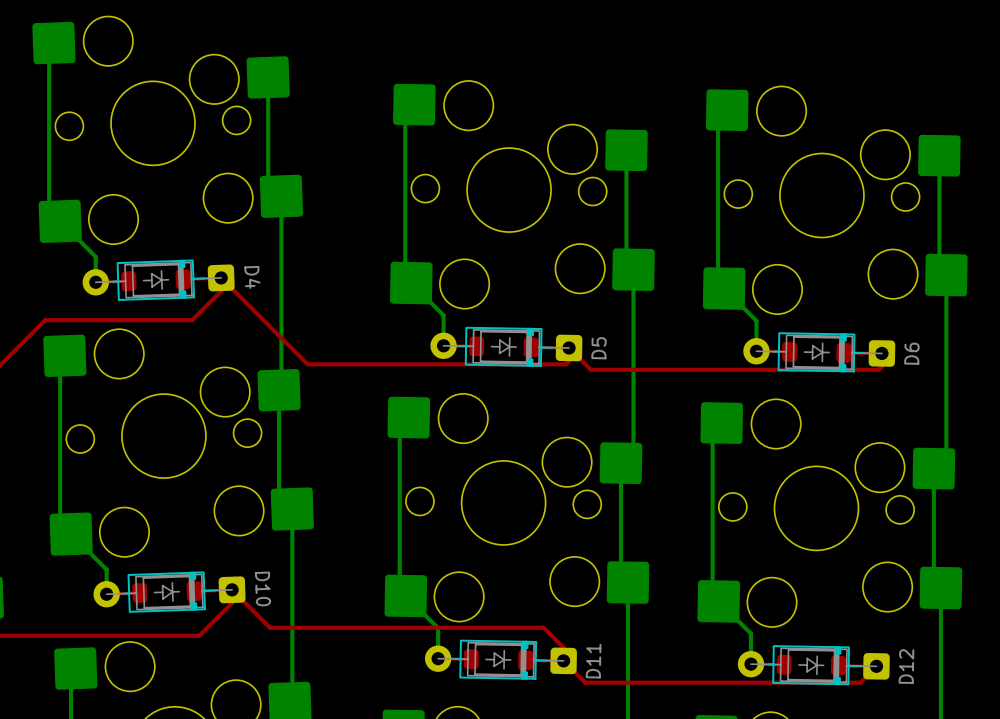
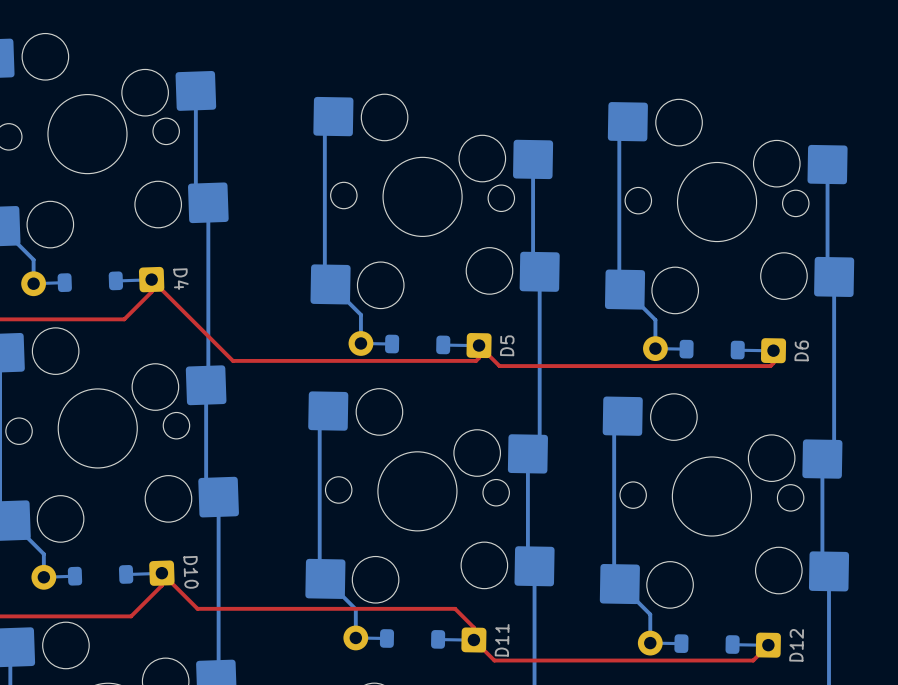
D4 footprint: [82, 259, 235, 301] -> [21, 266, 165, 297]
D5 footprint: [430, 326, 583, 367] -> [348, 331, 492, 359]
D6 footprint: [743, 332, 896, 373] -> [643, 336, 787, 364]
D10 footprint: [93, 571, 246, 613] -> [31, 560, 175, 590]
D11 footprint: [424, 639, 577, 680] -> [343, 625, 487, 653]
D12 footprint: [737, 645, 890, 686] -> [637, 630, 781, 658]

